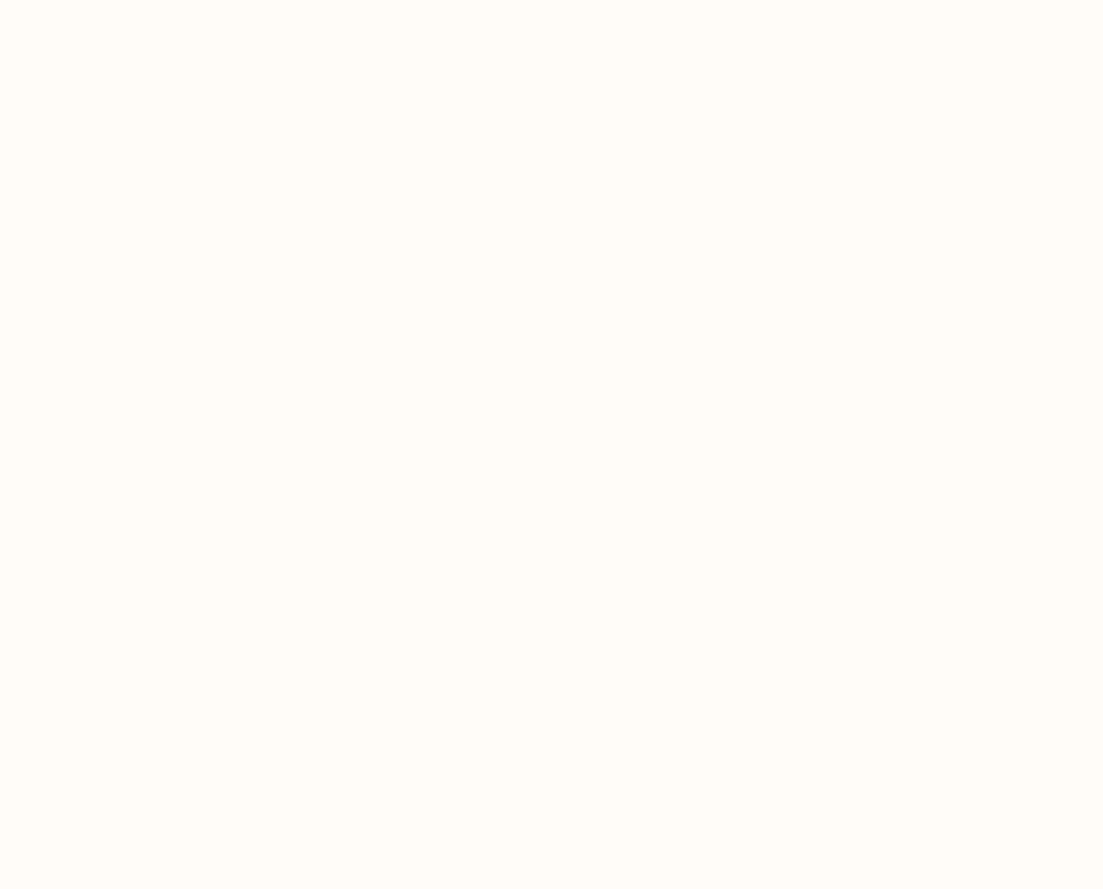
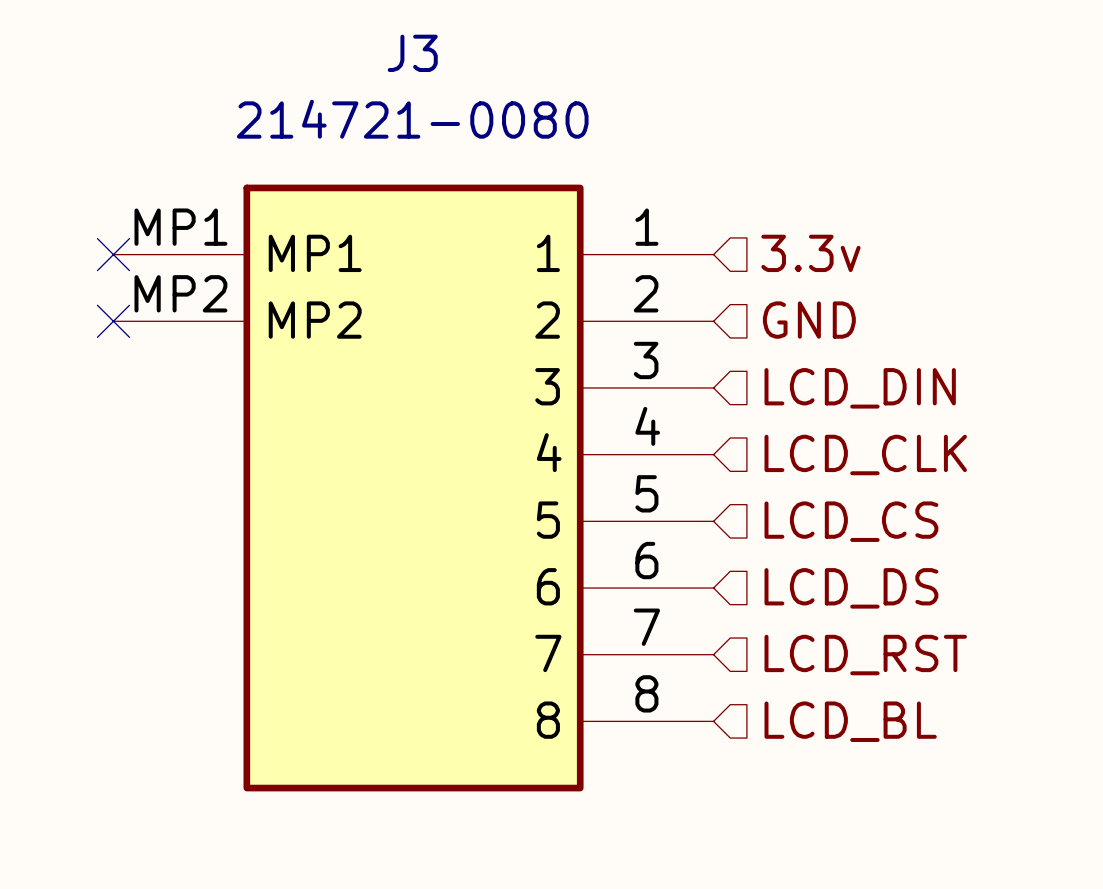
hierarchical label: none -> 3.3v (810, 253)
no-connect mark: none -> (113, 254)
hierarchical label: none -> GND (809, 320)
no-connect mark: none -> (113, 321)
hierarchical label: none -> LCD_DIN (860, 388)
hierarchical label: none -> LCD_CLK (865, 455)
J3: none -> 214721-0080 (413, 488)
hierarchical label: none -> LCD_CS (851, 521)
hierarchical label: none -> LCD_DS (851, 588)
hierarchical label: none -> LCD_RST (865, 655)
hierarchical label: none -> LCD_BL (850, 721)

